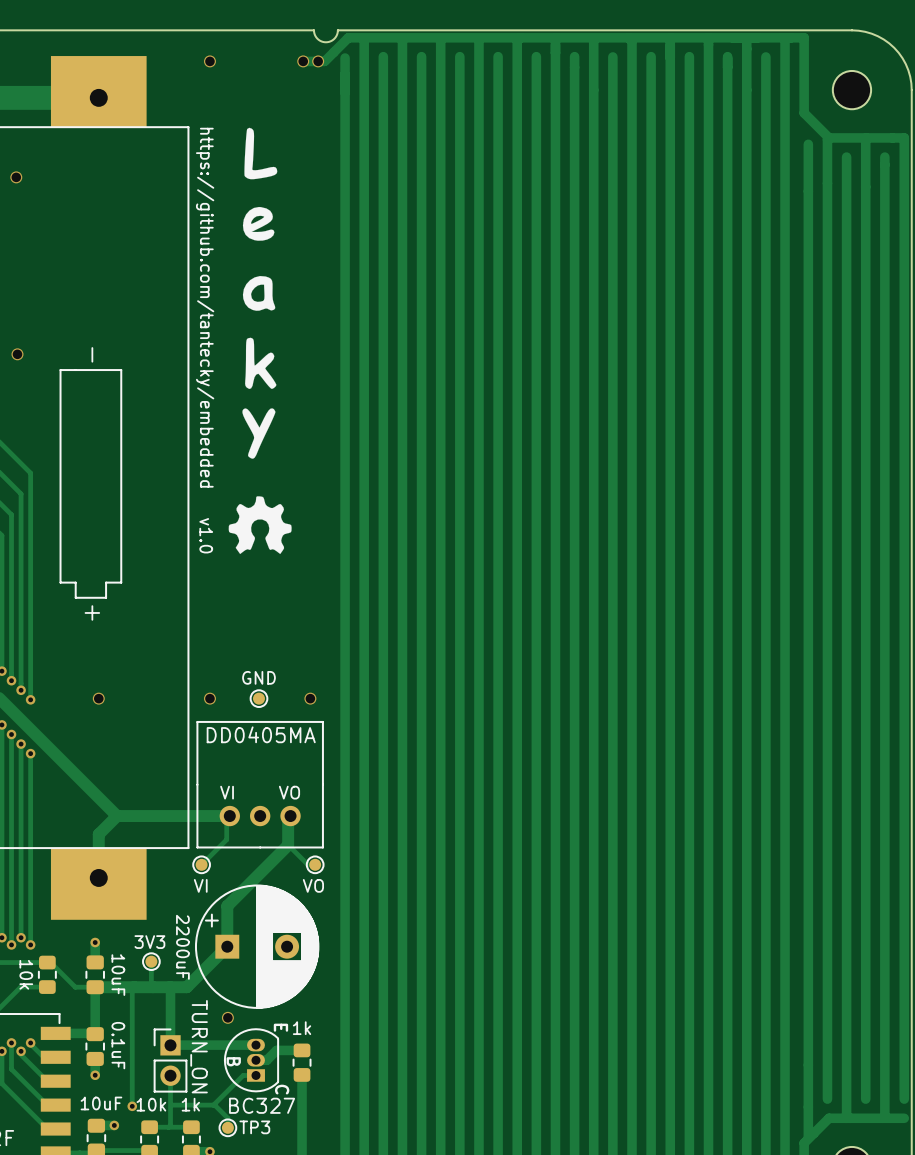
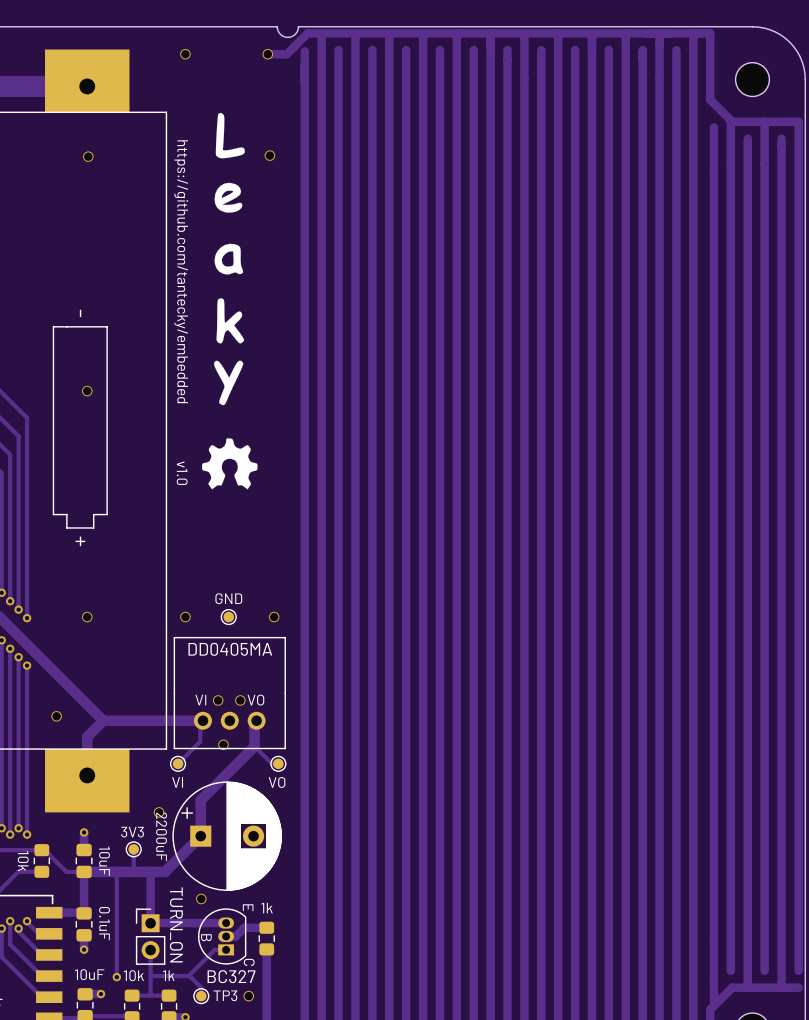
via: (318, 61) -> none
via: none -> (269, 155)
via: (16, 177) -> none
via: none -> (88, 156)
via: (17, 354) -> none
via: none -> (87, 391)
via: none -> (218, 700)
via: none -> (240, 700)
via: none -> (56, 716)
via: none -> (223, 744)
via: none -> (159, 812)
via: none -> (248, 996)

